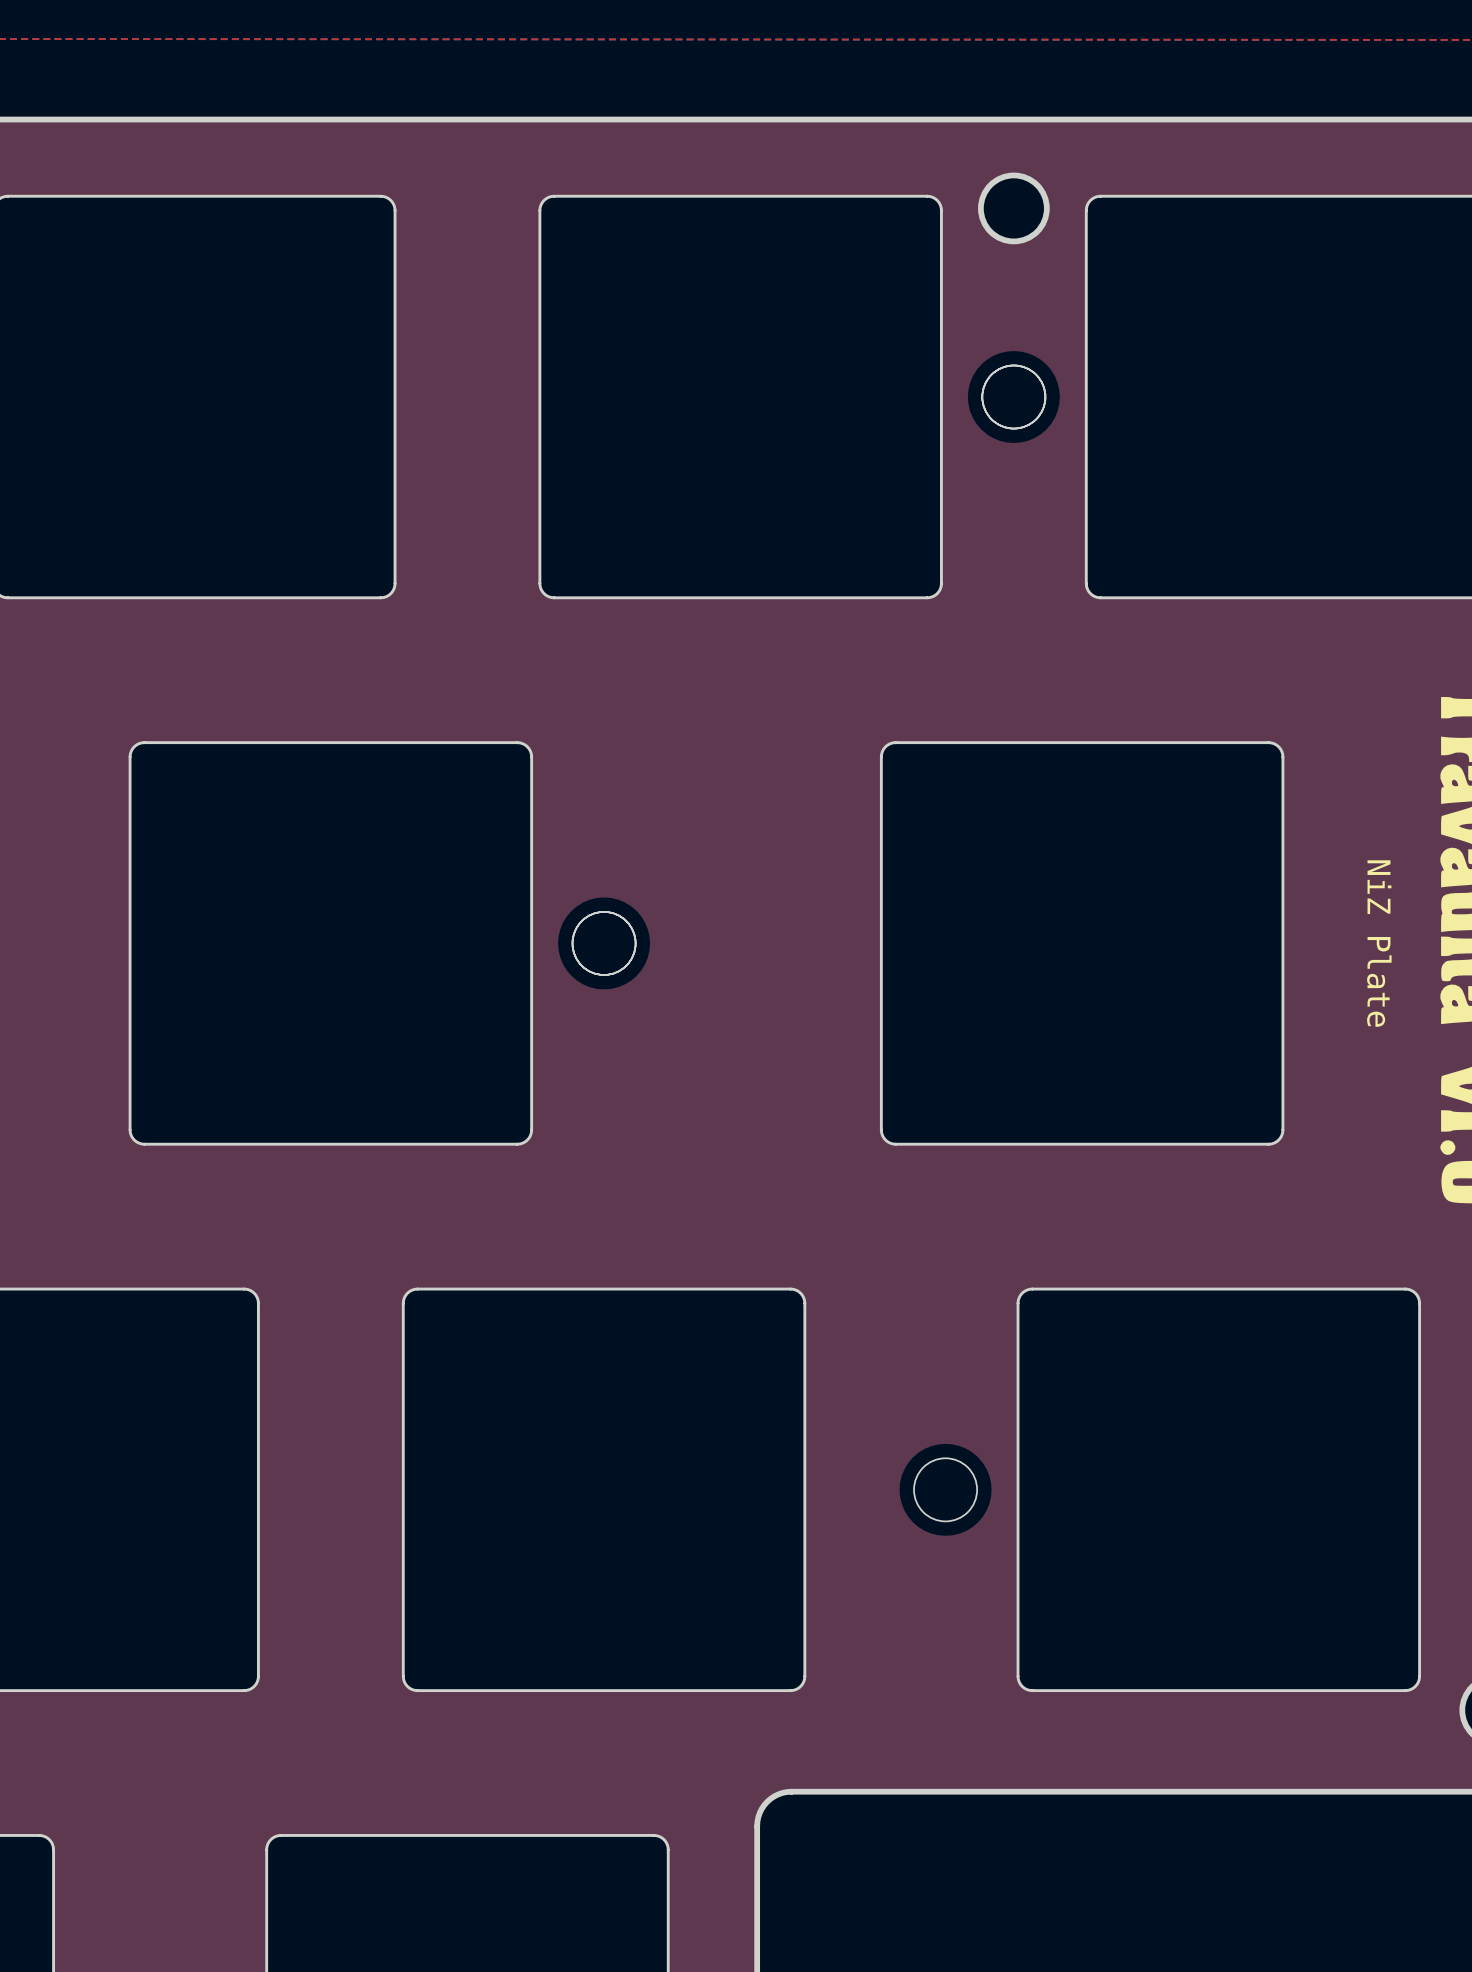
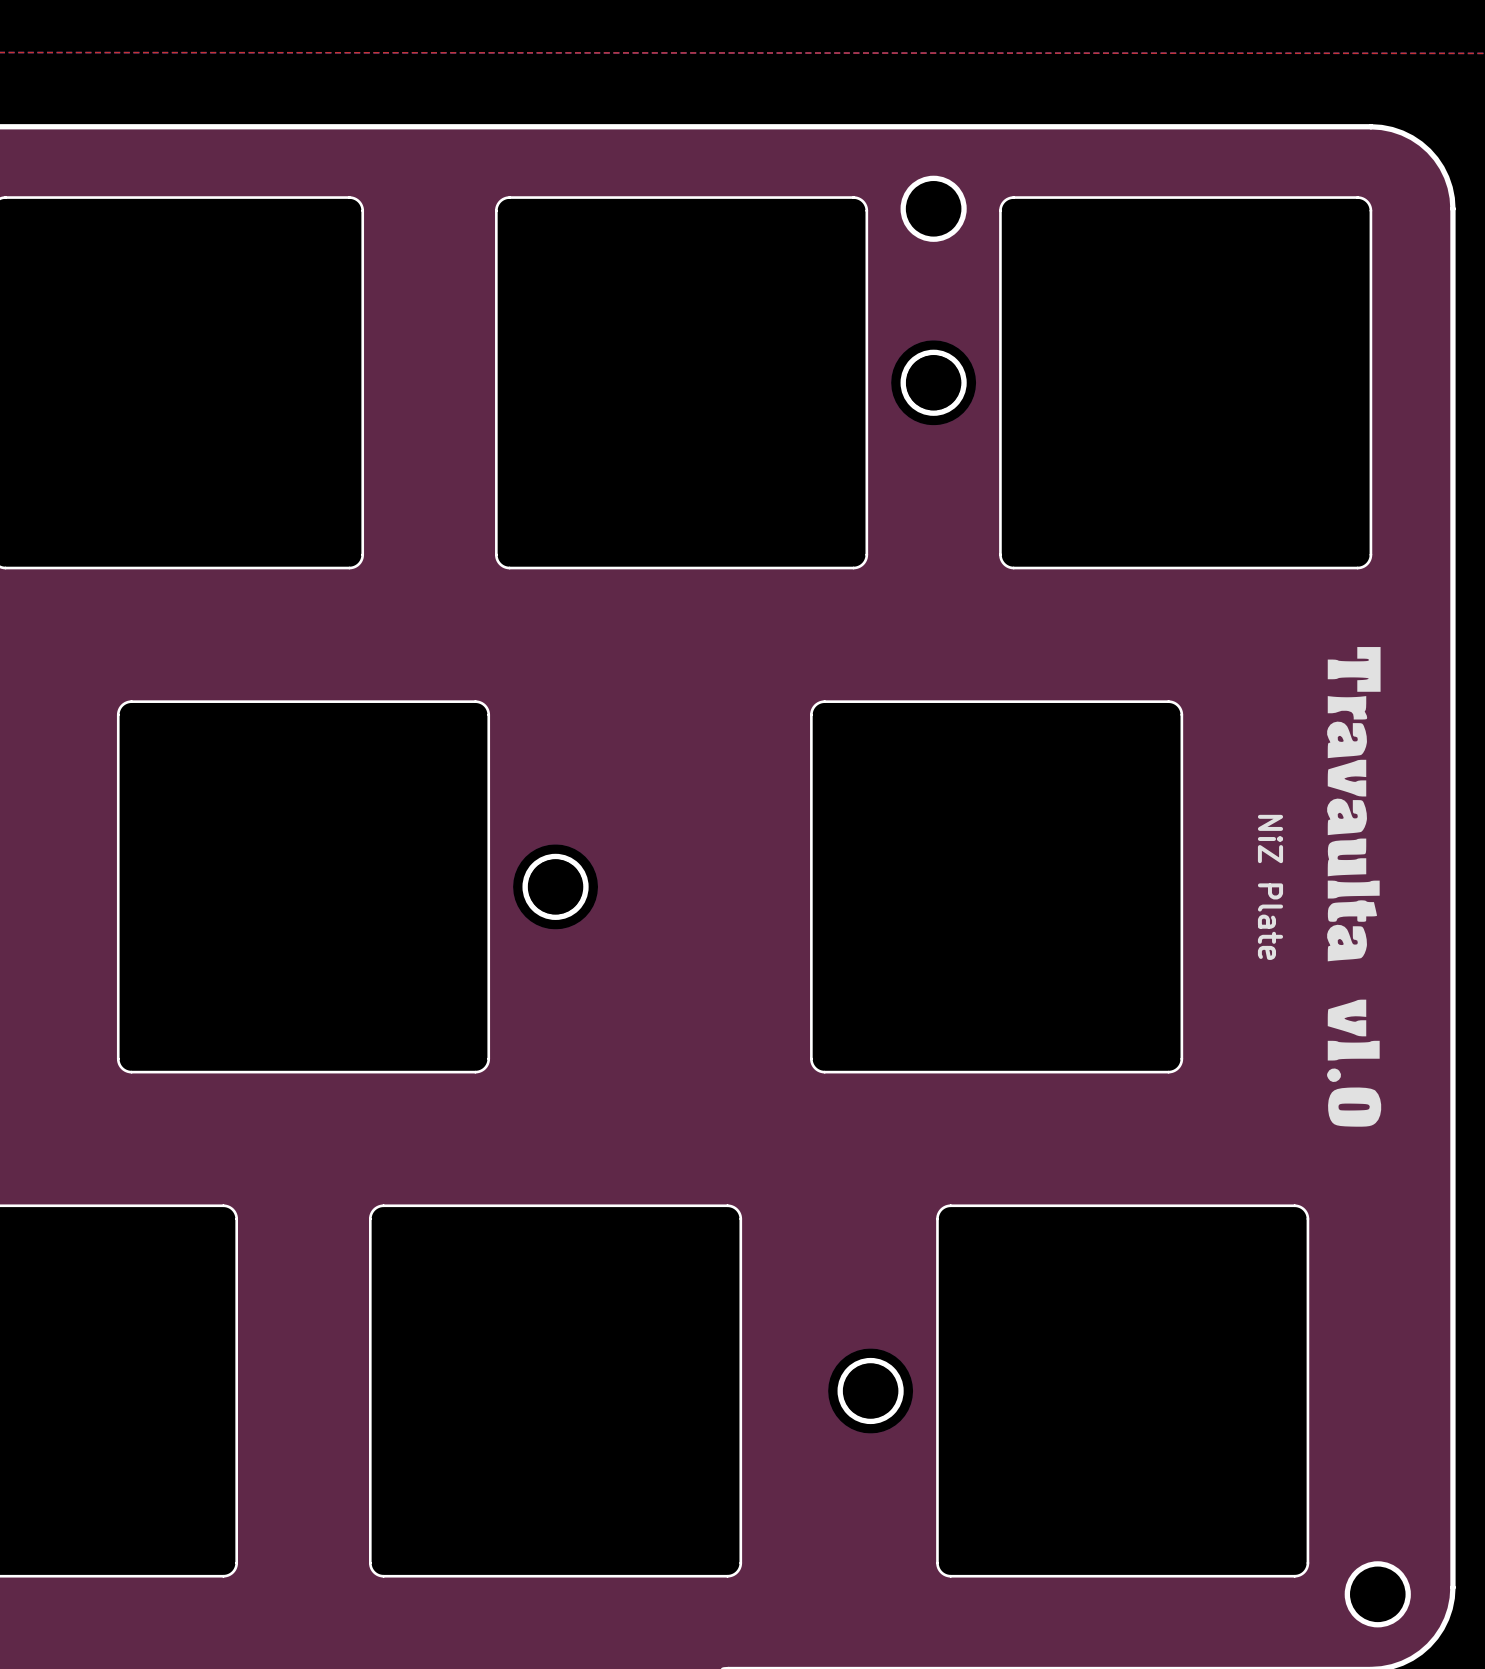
round board edge: none -> [900, 349, 967, 416]
round board edge: none -> [522, 853, 589, 920]
round board edge: none -> [837, 1357, 904, 1425]

